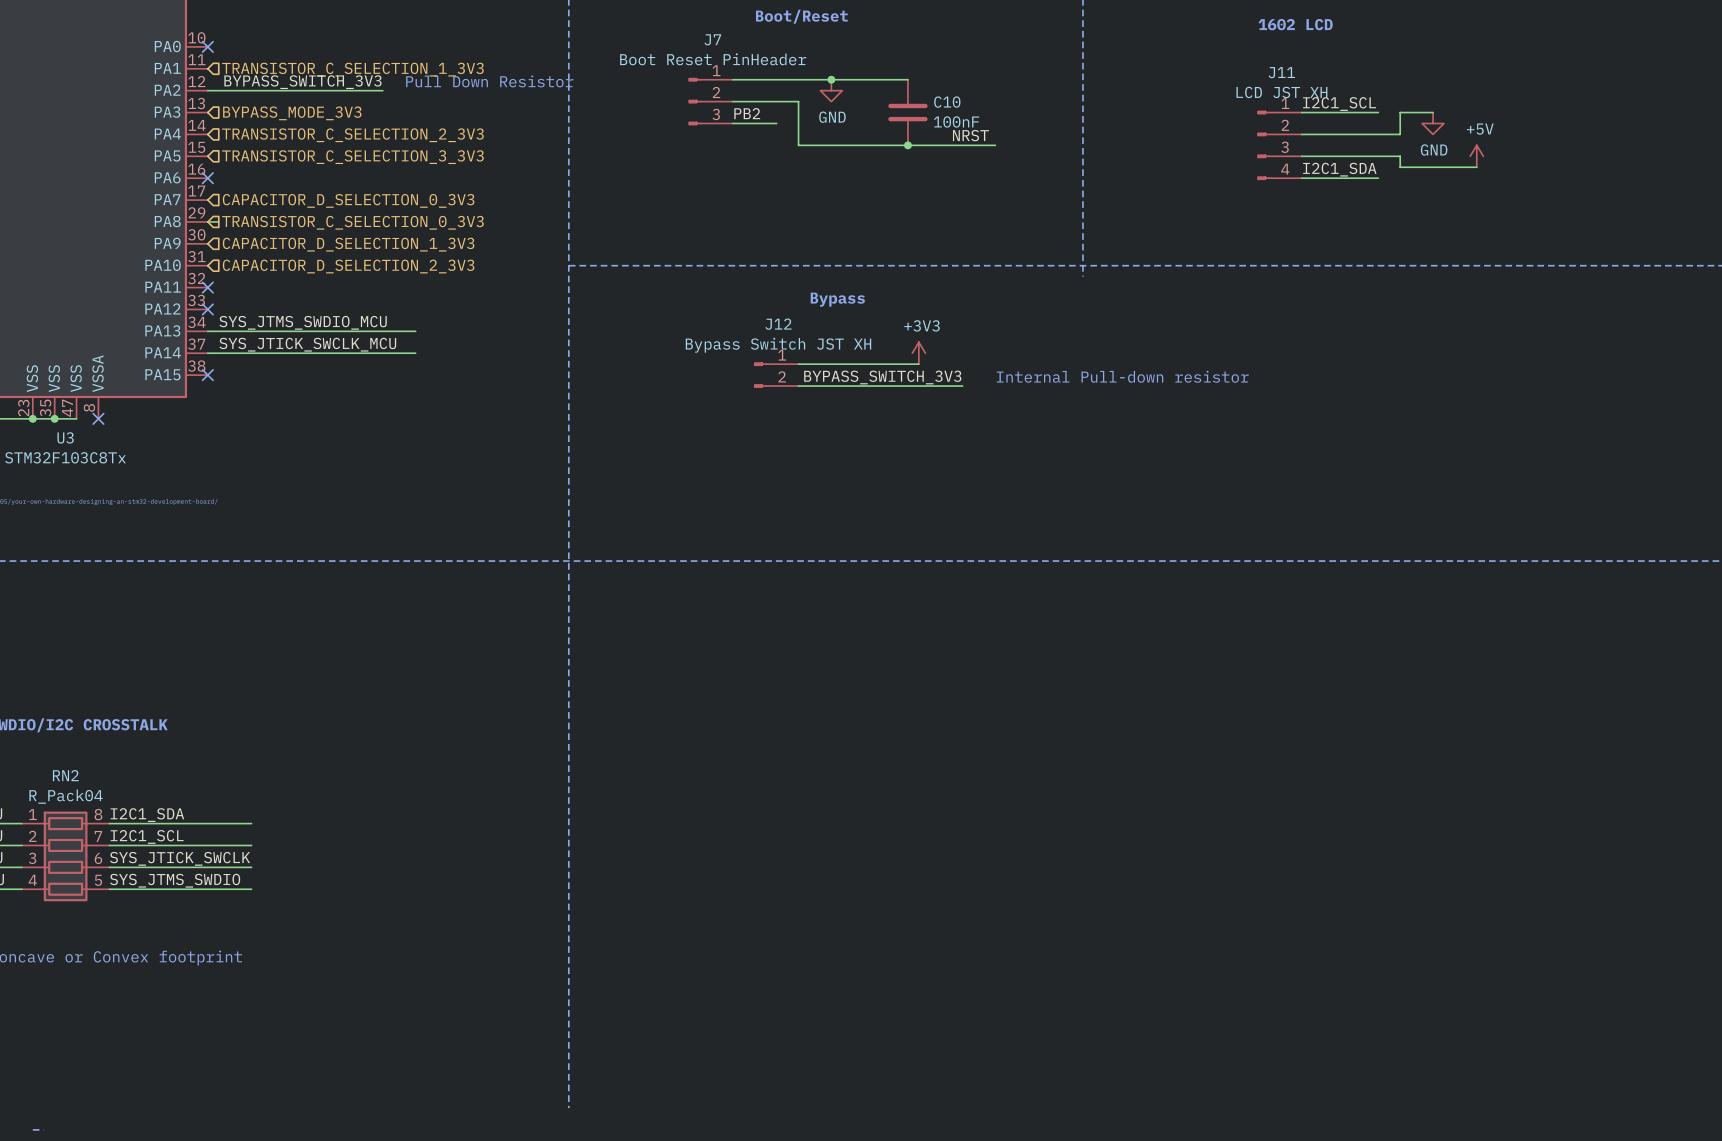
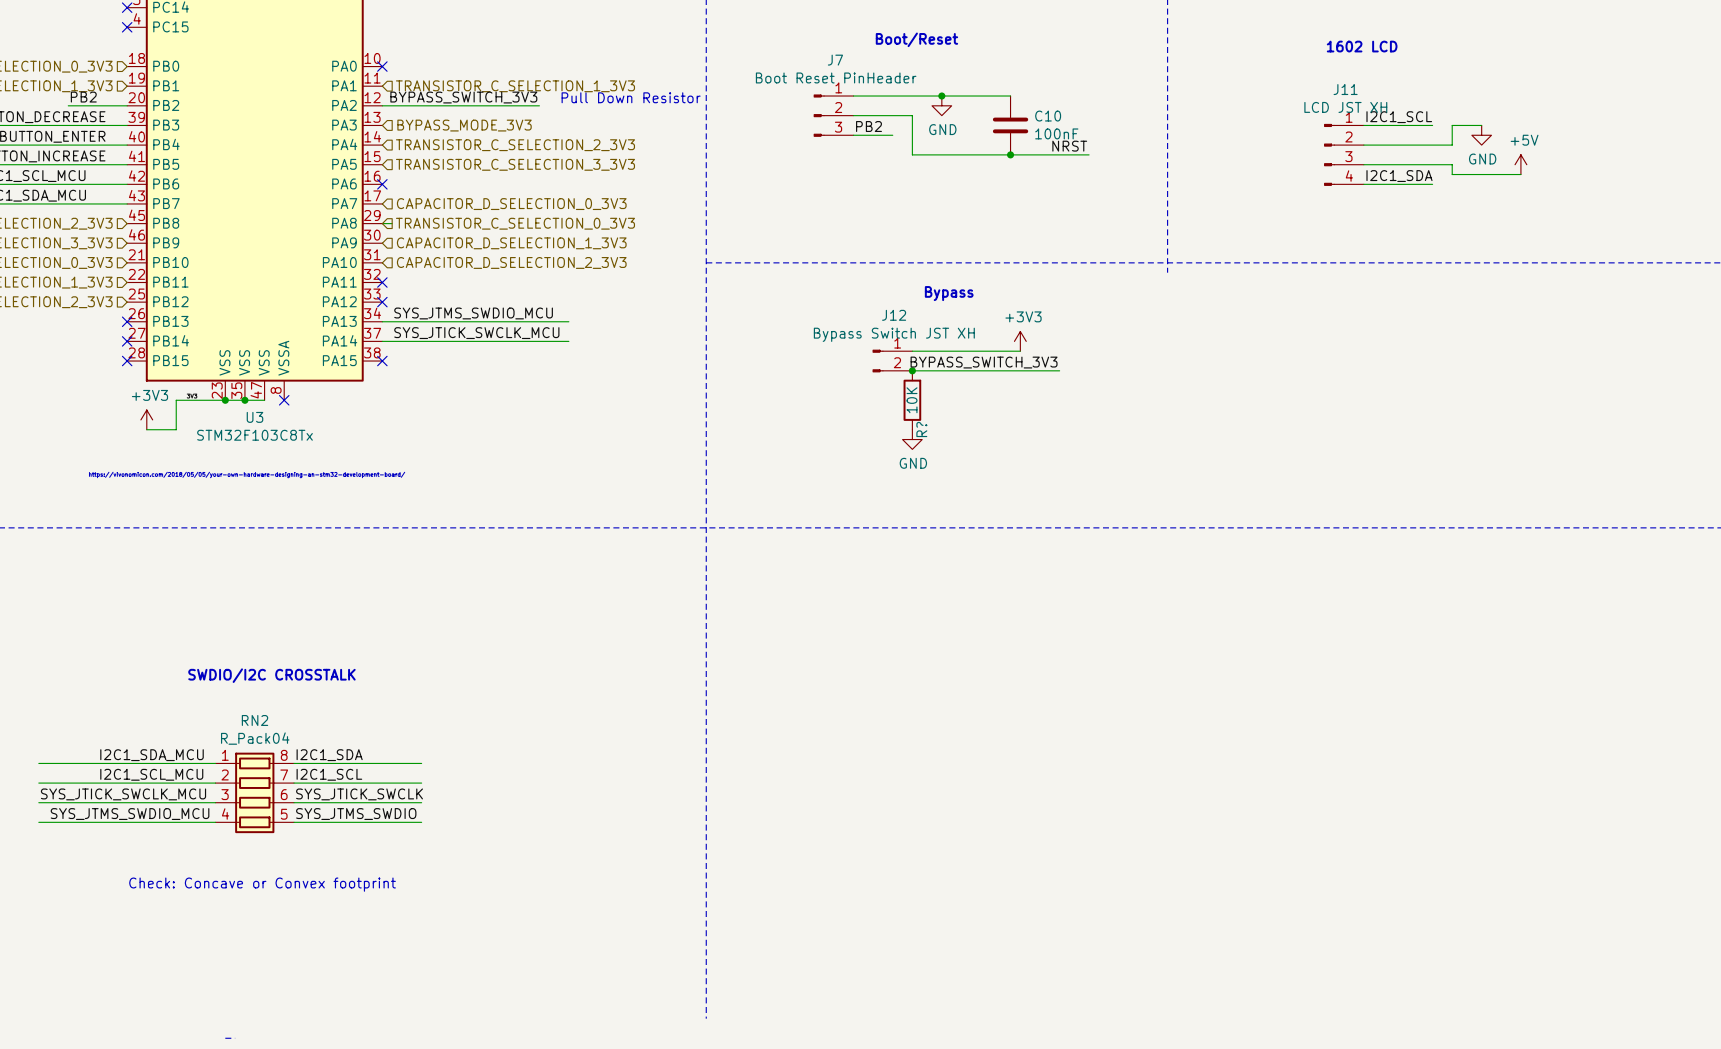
text: Internal Pull-down resistor (1122, 376) -> none
junction: none -> (912, 370)
R?: none -> 10K (912, 400)
power symbol: none -> GND (912, 439)

